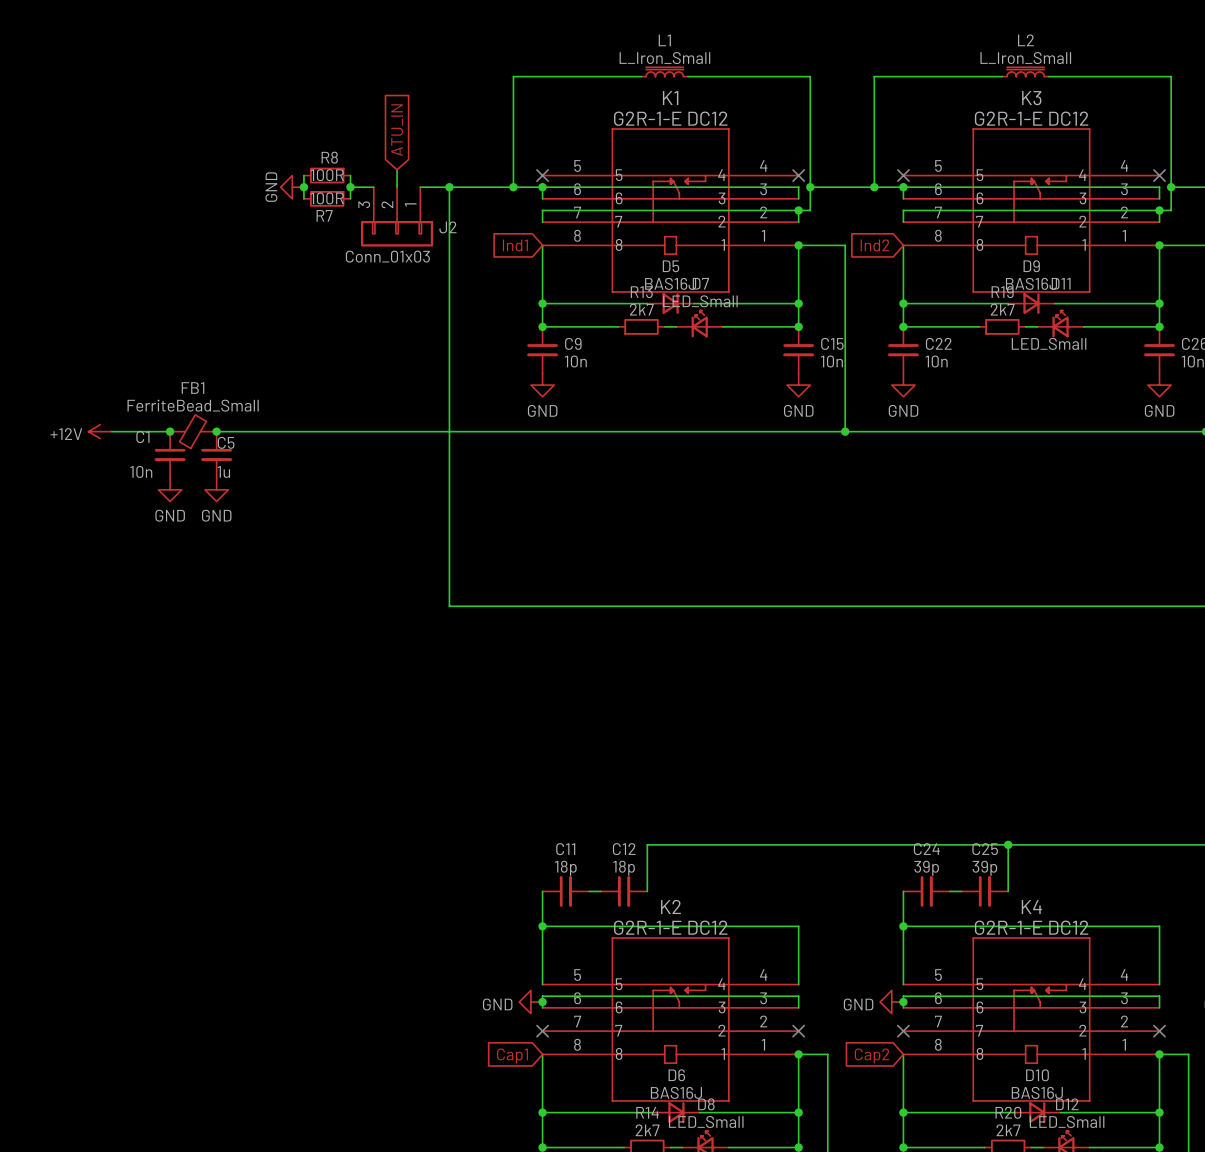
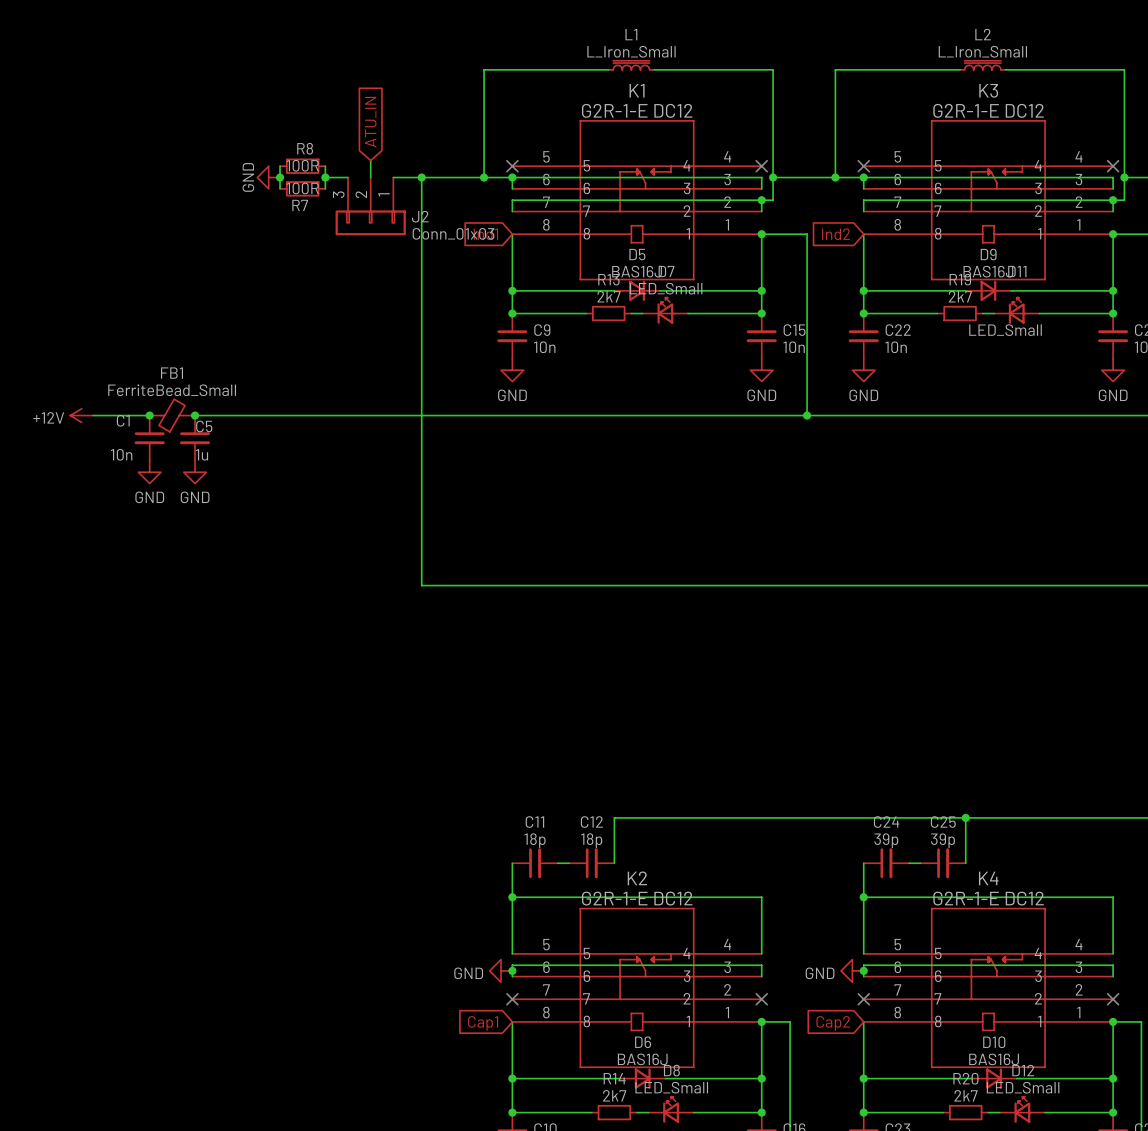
J2 value position: Conn_01x03 (387, 256) -> Conn_01x03 (453, 233)

